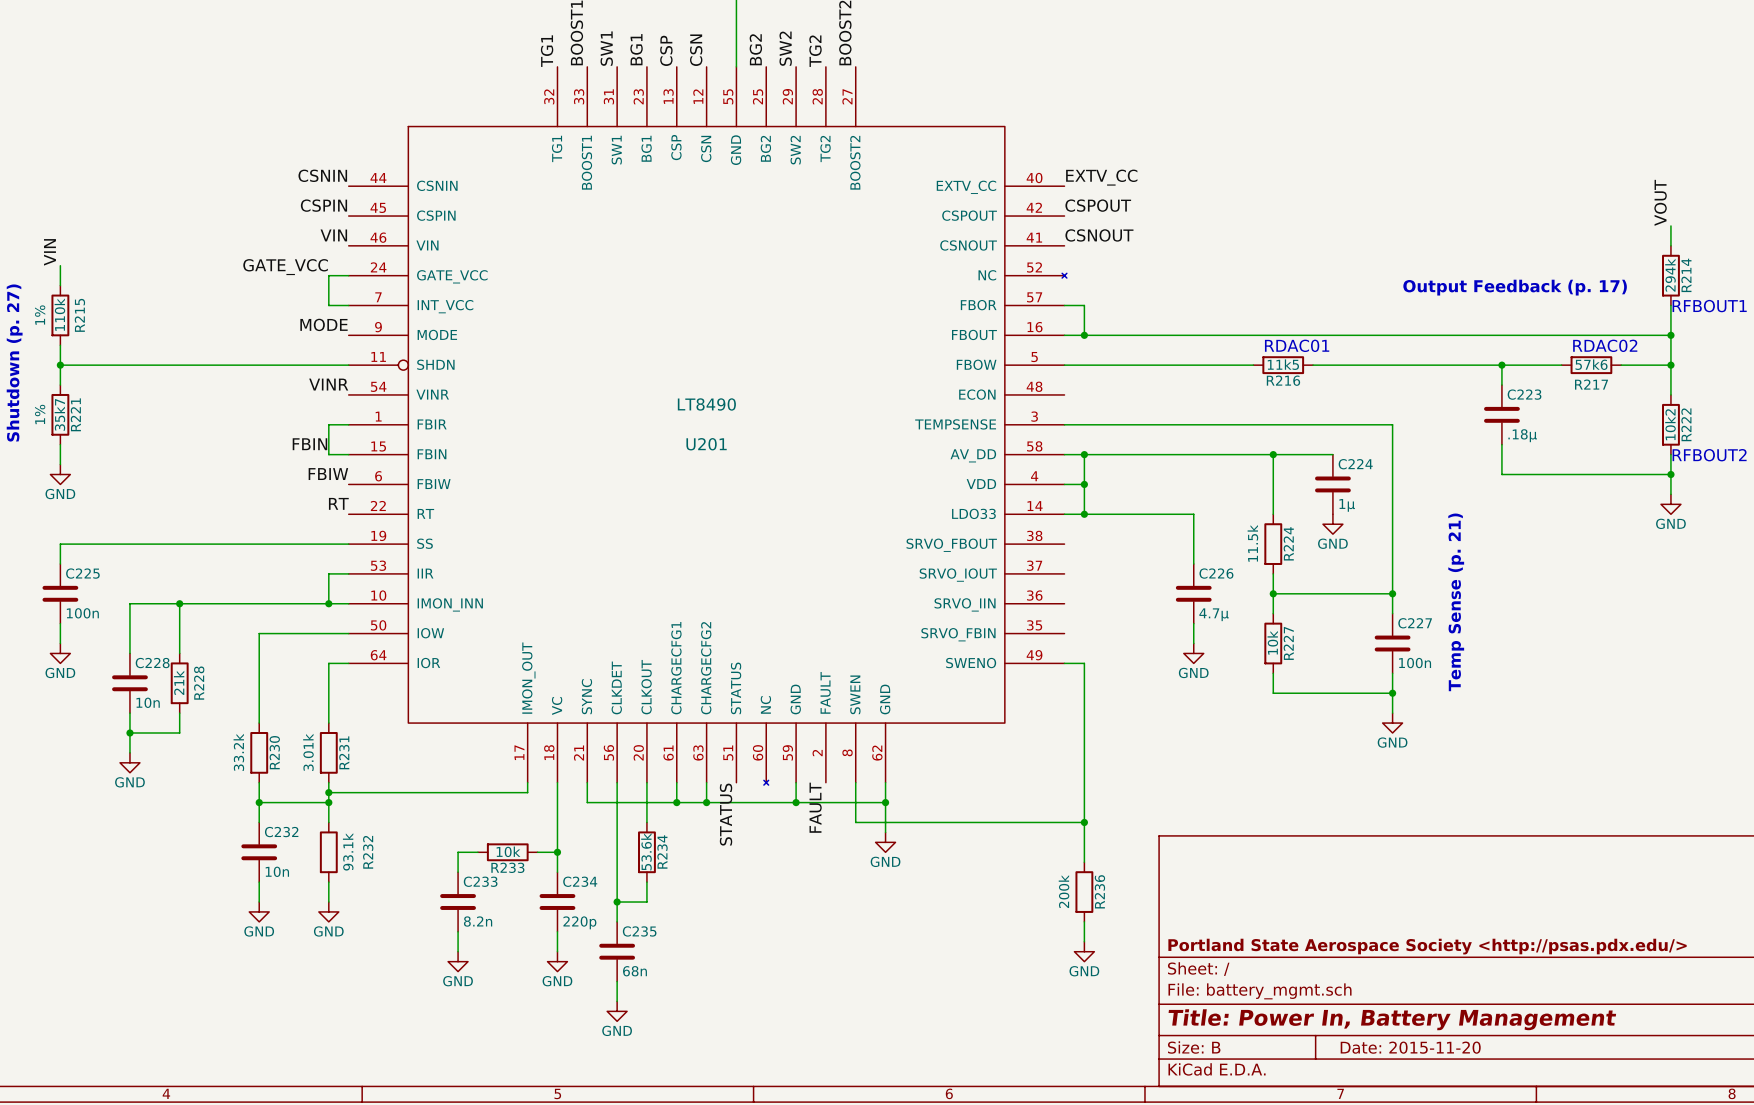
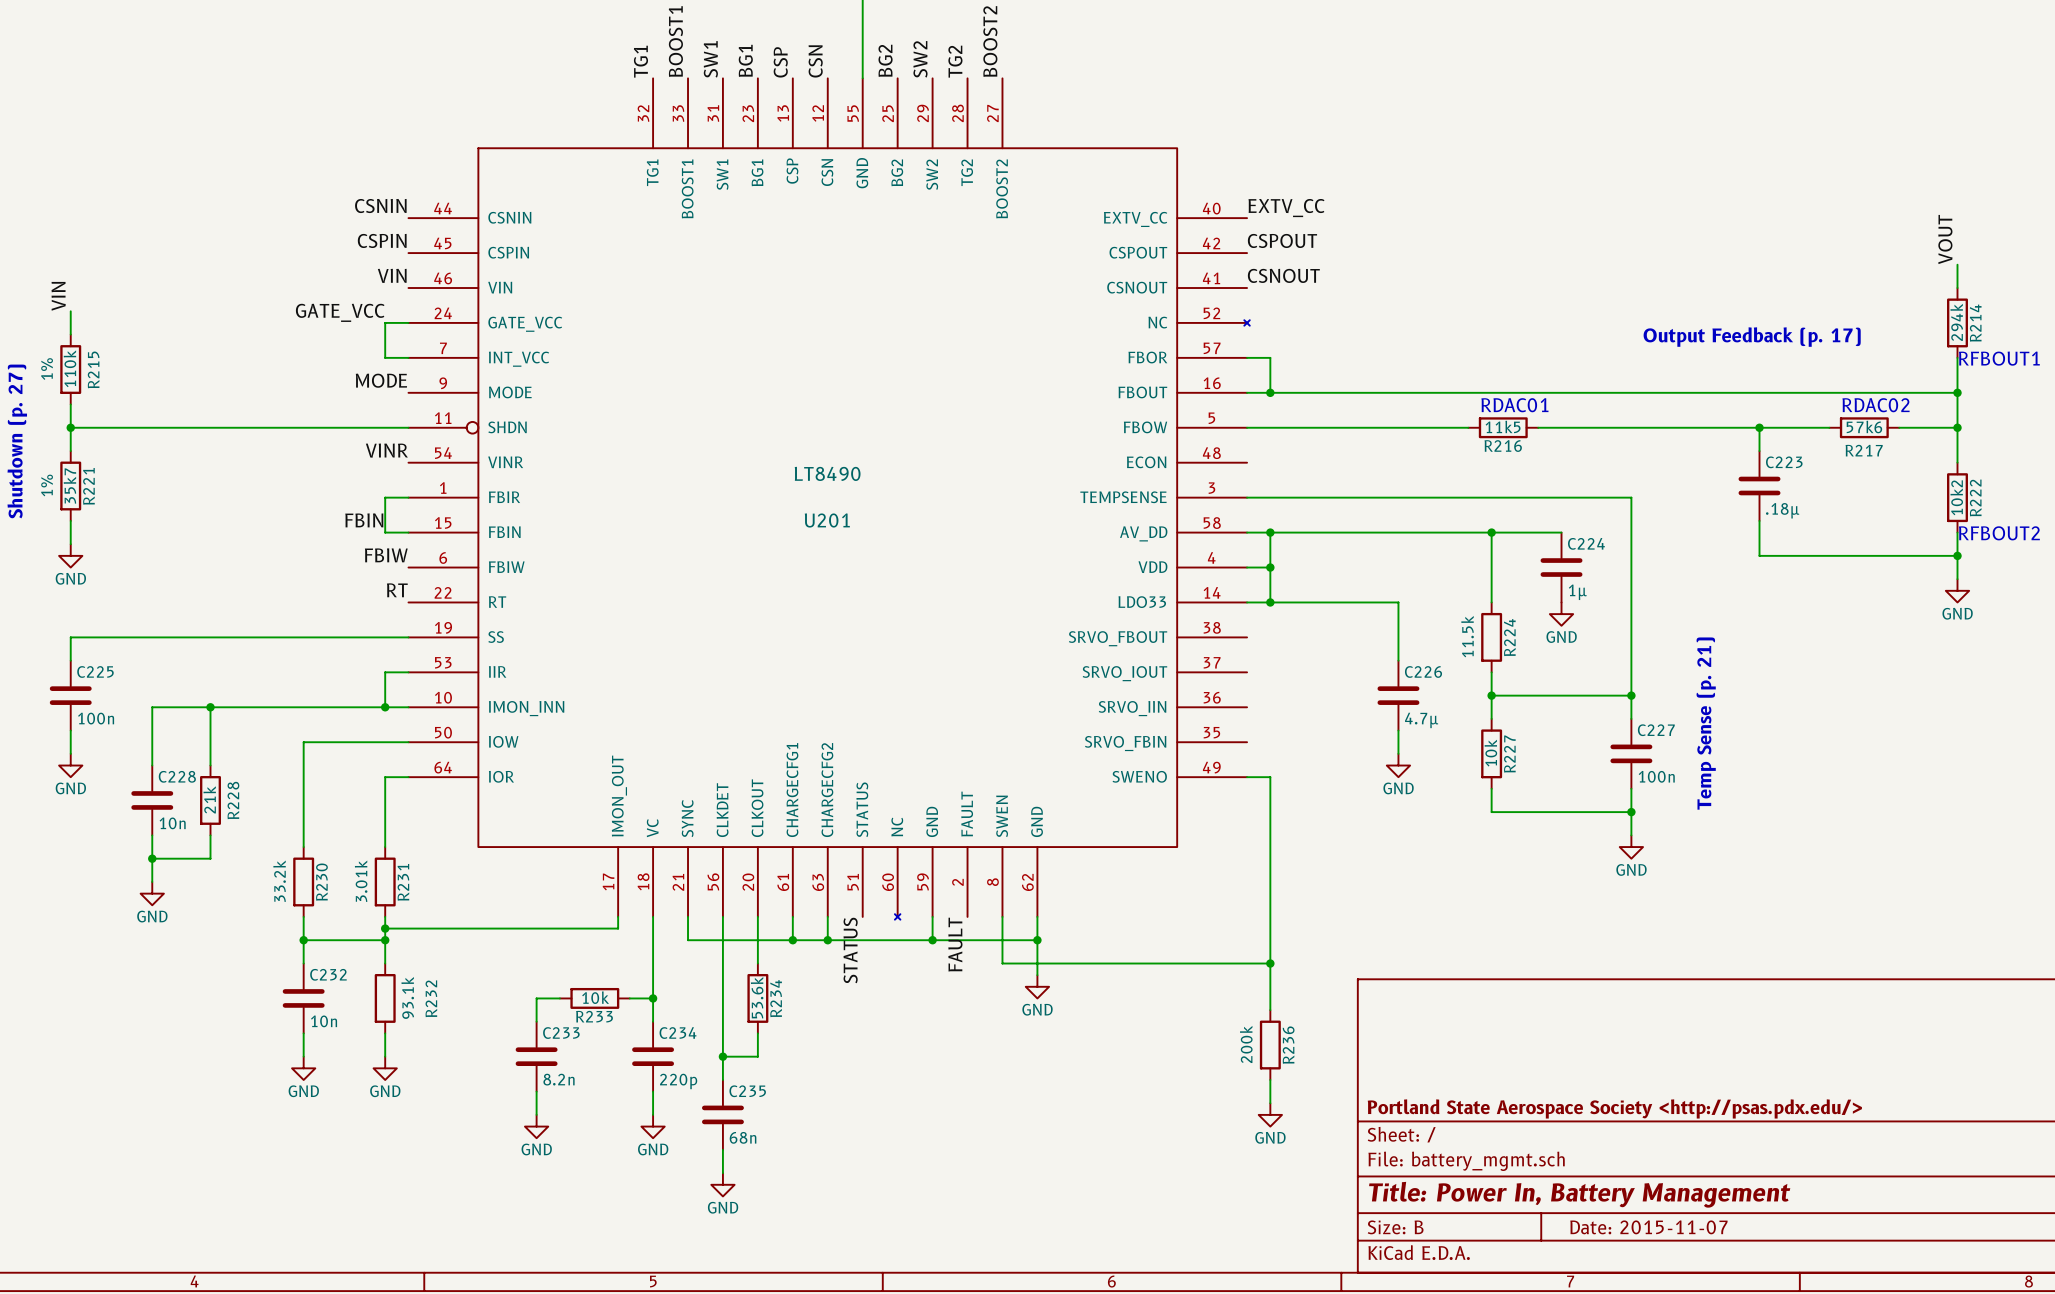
title block: Date: 2015-11-20 (1410, 1047) -> Date: 2015-11-07 (1648, 1227)

